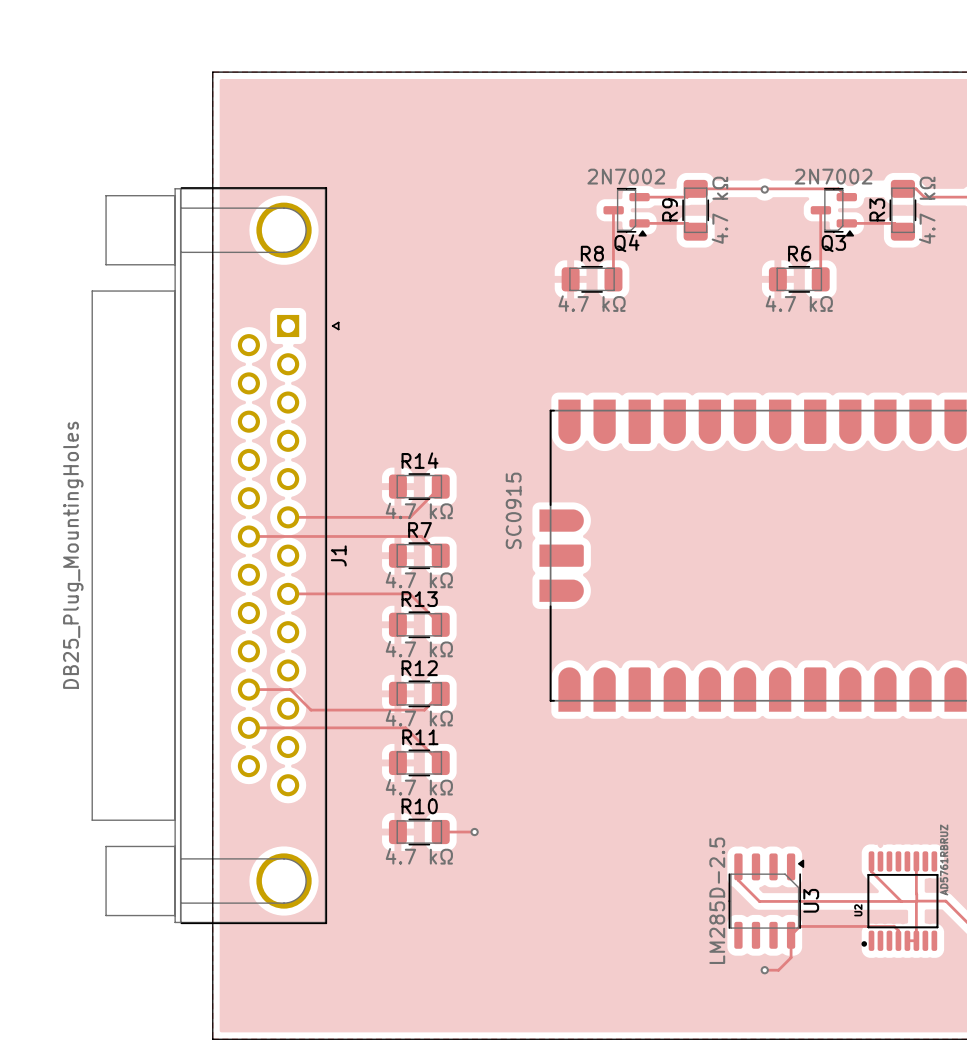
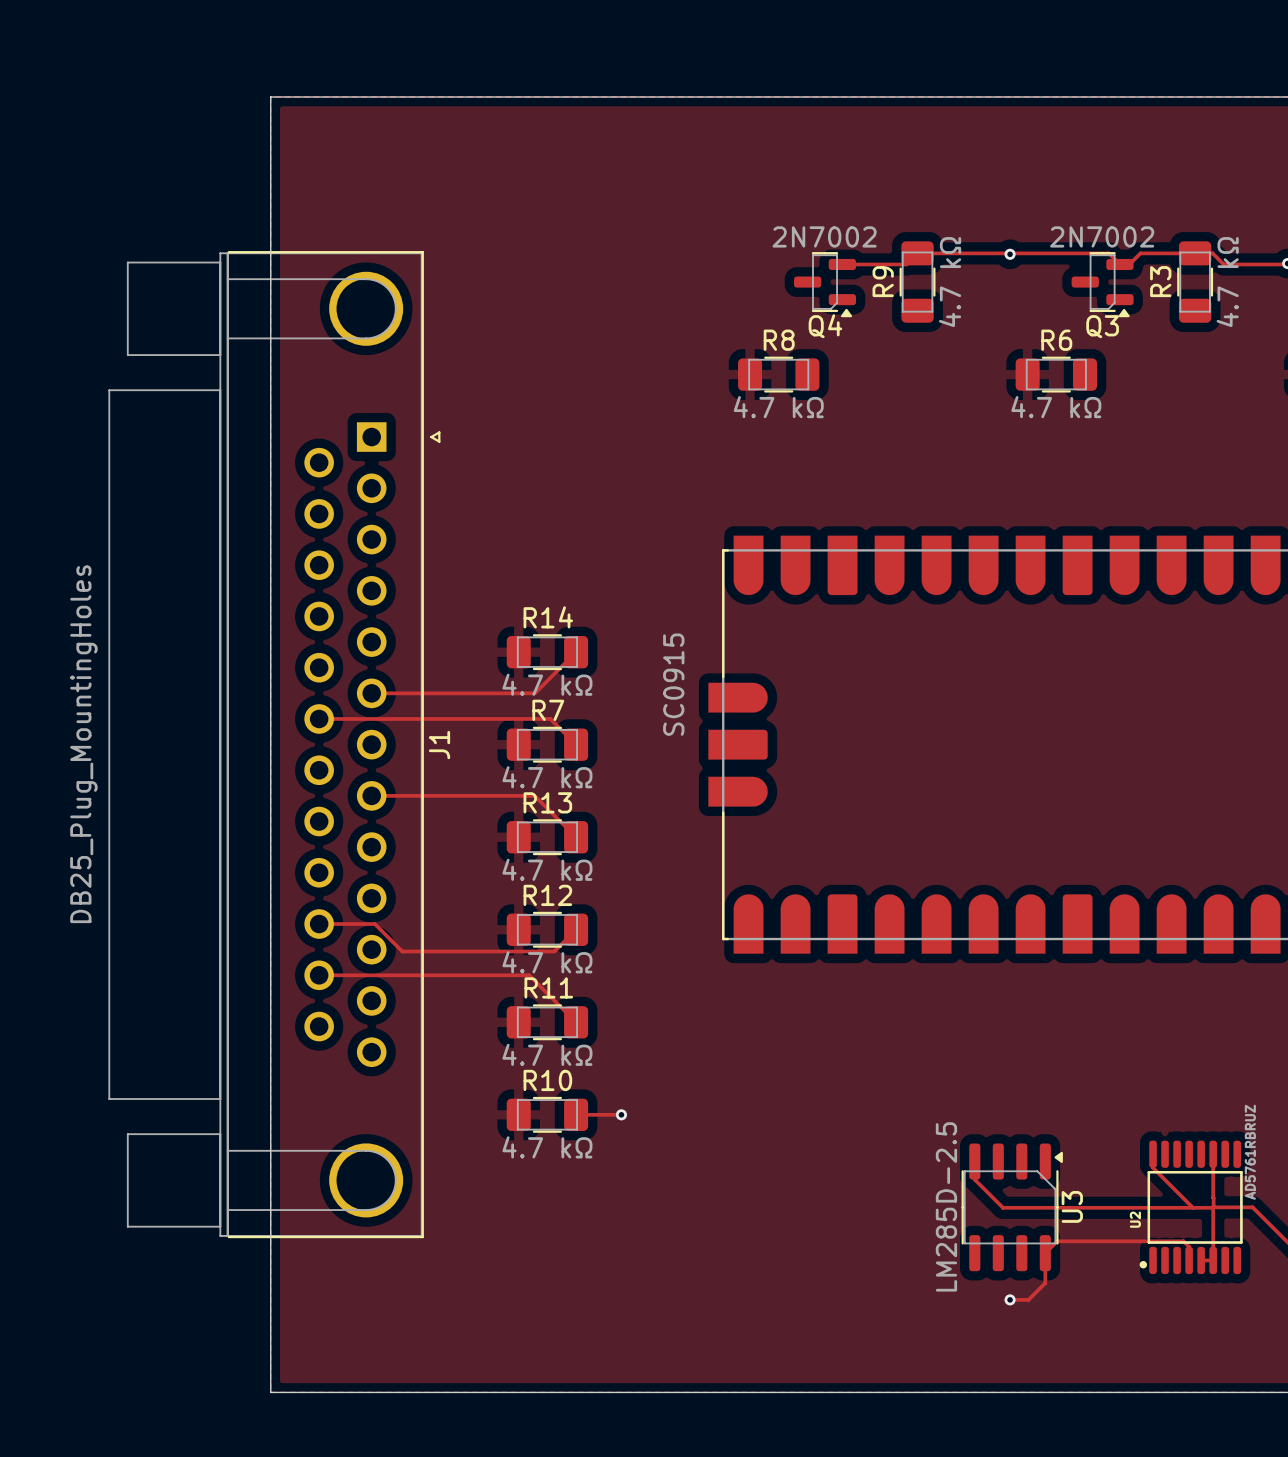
track: none -> (1195, 253) (1140, 253) (1129, 264)
track: (613, 210) (613, 279) -> none
track: (820, 210) (820, 279) -> none
track: (639, 223) (687, 223) (695, 231) -> none
track: (846, 223) (894, 223) (902, 231) -> none

